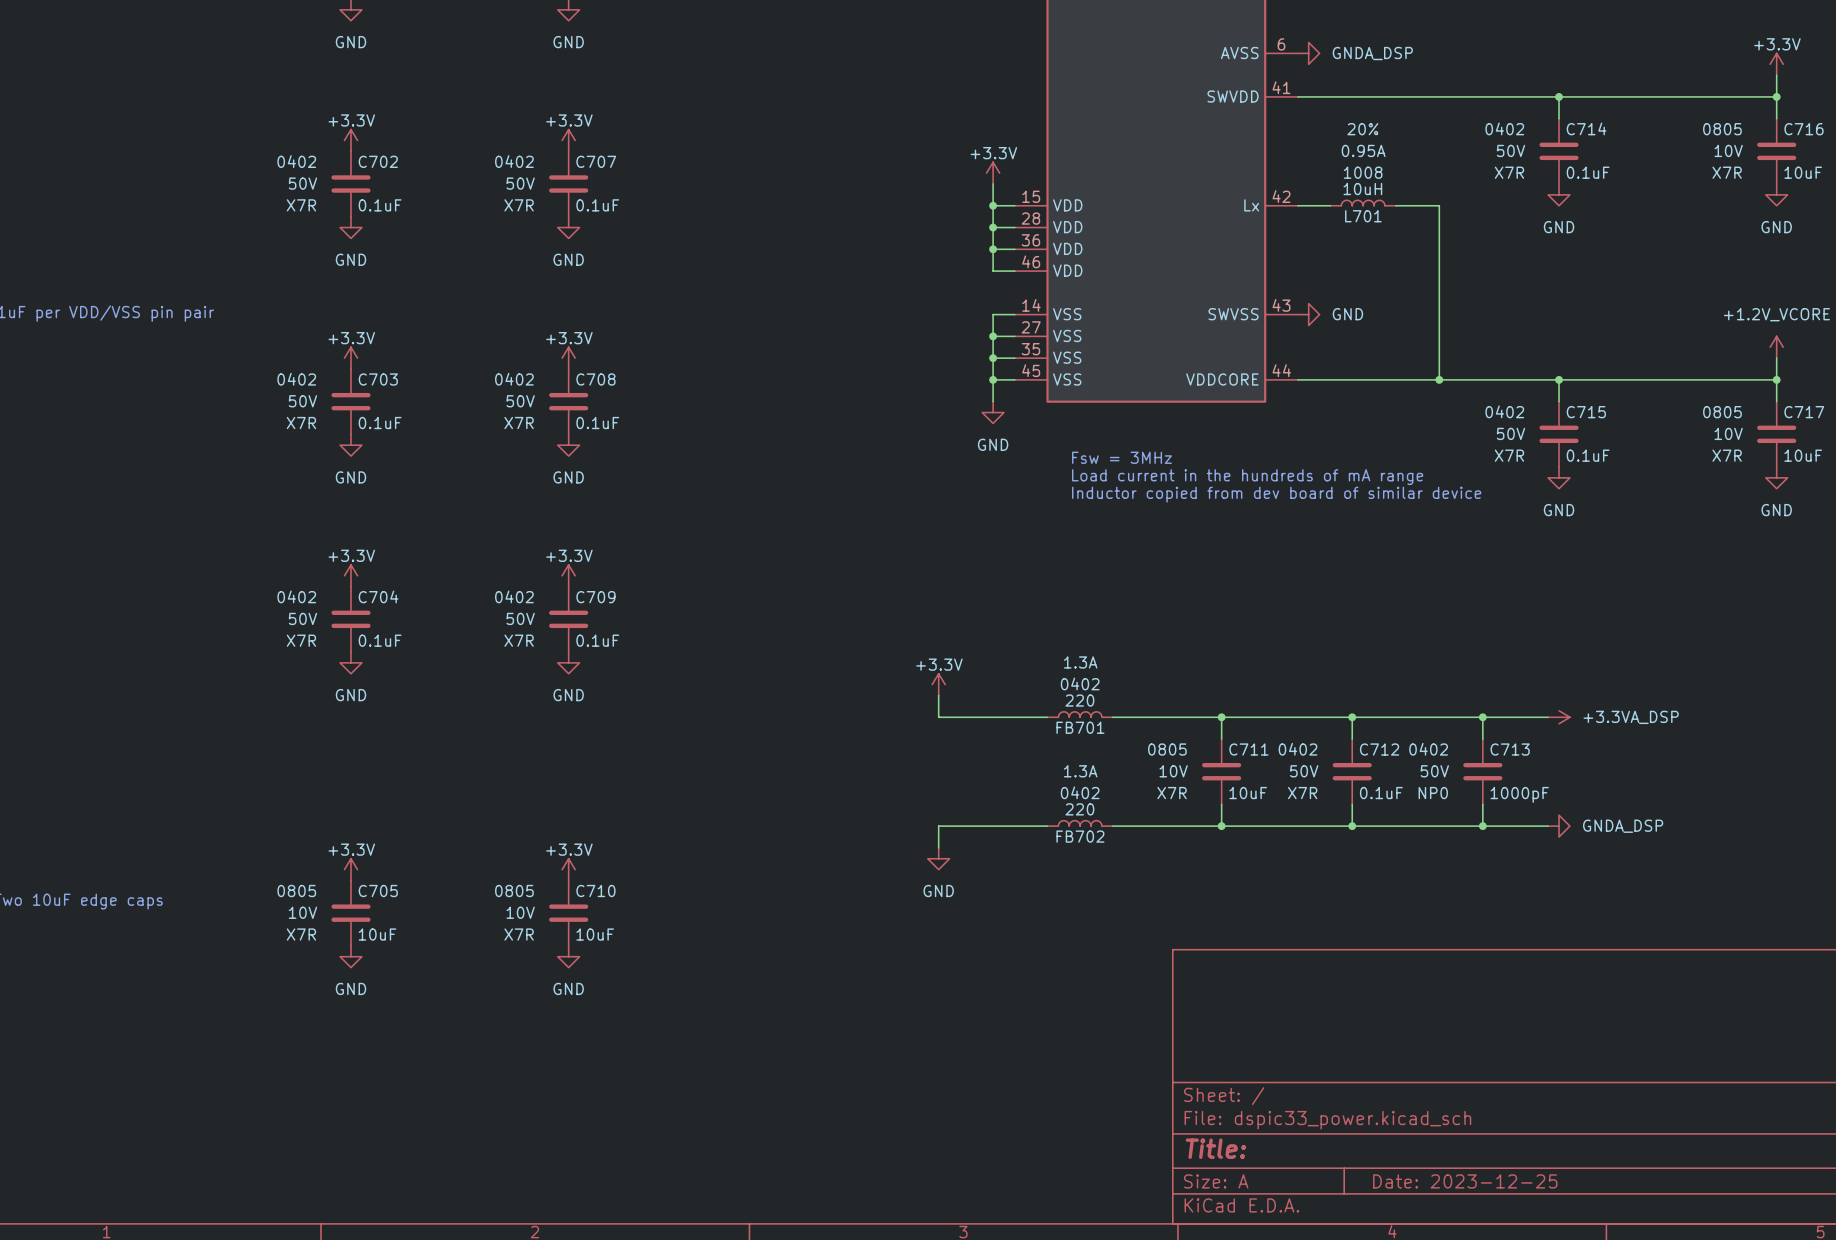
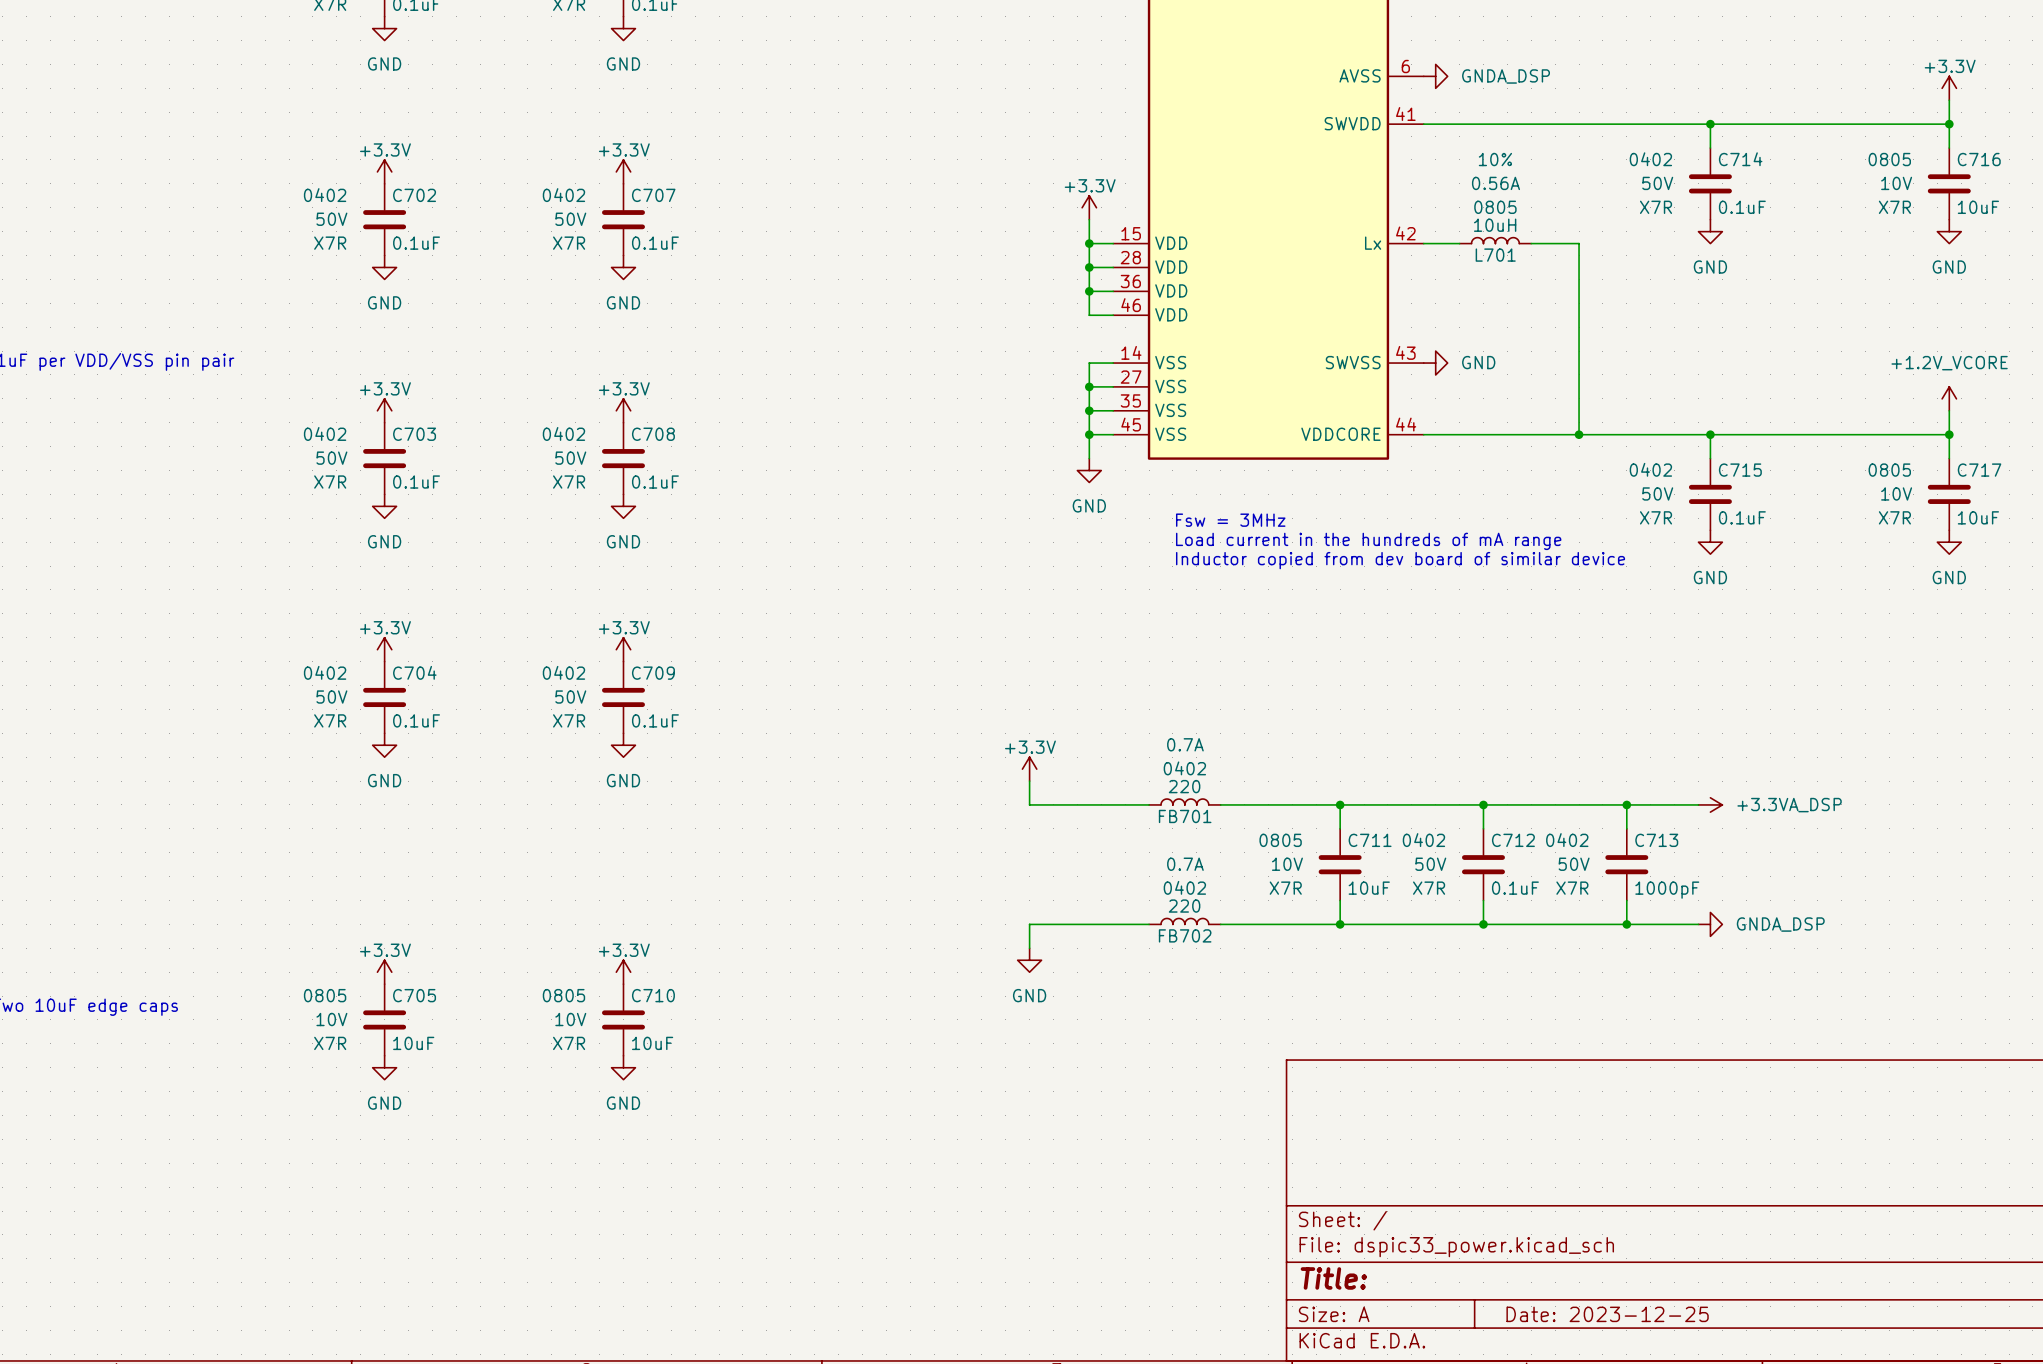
L701 text: 20% (1362, 129) -> 10% (1495, 159)
L701 text: 0.95A (1363, 150) -> 0.56A (1495, 183)
L701 text: 1008 (1363, 172) -> 0805 (1495, 207)
FB701 text: 1.3A (1080, 662) -> 0.7A (1185, 744)
FB702 text: 1.3A (1080, 771) -> 0.7A (1185, 864)
C713 text: NP0 (1433, 793) -> X7R (1572, 888)

